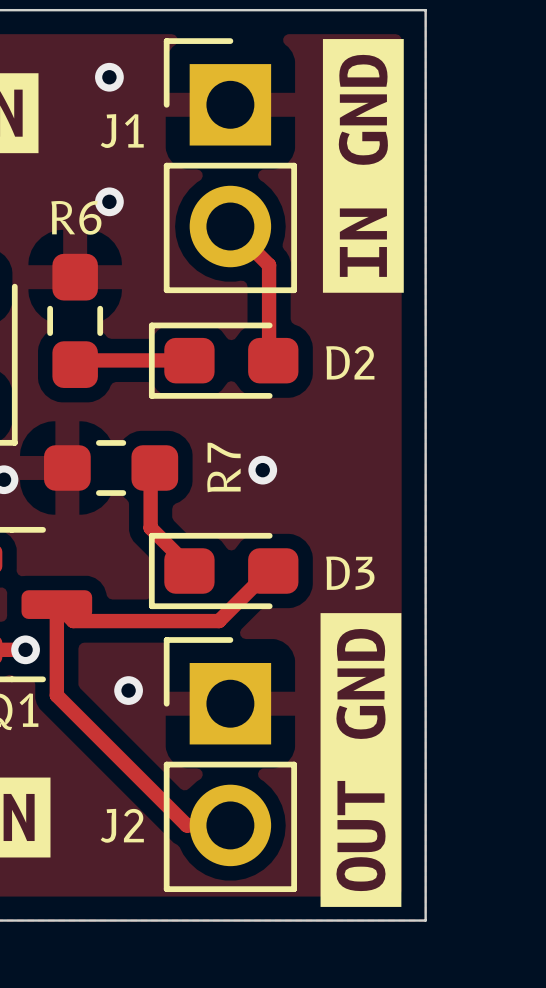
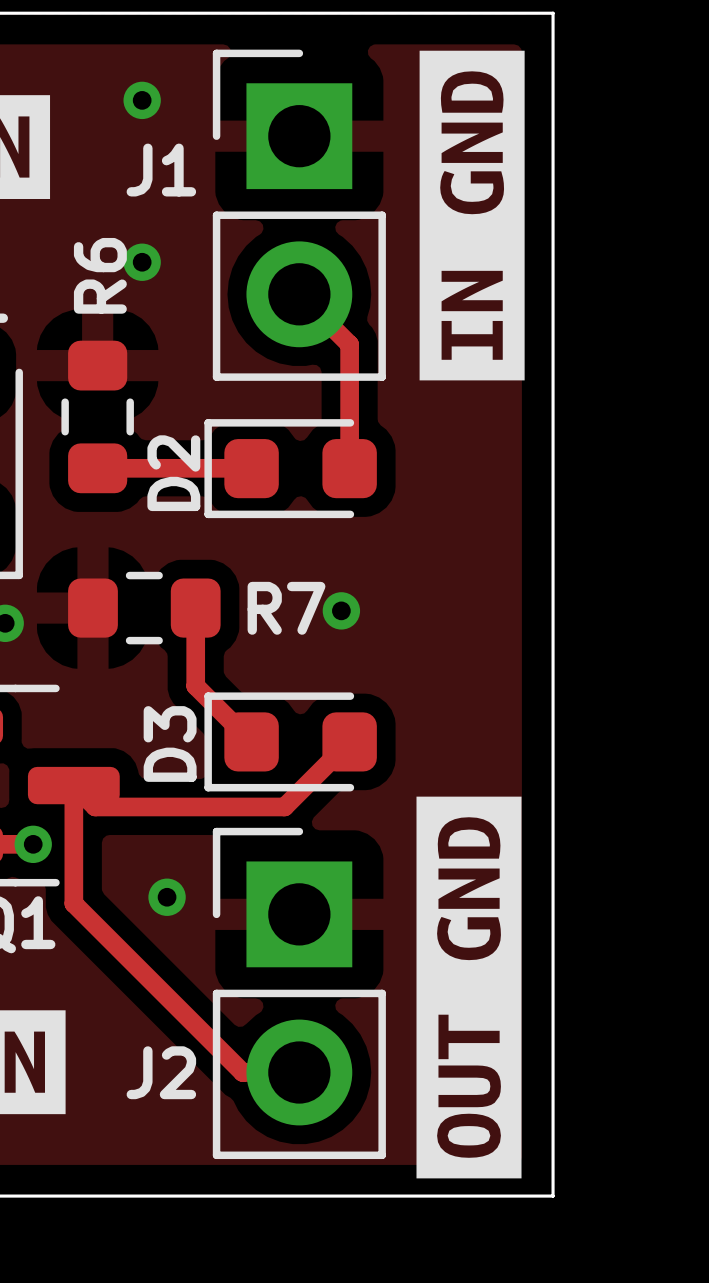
R6 name rotation: 0° (76, 217) -> 90° counterclockwise (100, 275)
R6 footprint: [47, 253, 104, 388] -> [61, 340, 134, 494]
D2 footprint: [148, 322, 299, 399] -> [204, 419, 377, 519]
D2 name rotation: 0° (350, 362) -> 90° counterclockwise (173, 473)
D2 name position: D2 (350, 362) -> D2 (173, 473)
R7 footprint: [44, 440, 179, 496] -> [68, 571, 221, 645]
R7 name rotation: 0° (223, 467) -> 90° clockwise (286, 608)
D3 footprint: [148, 532, 299, 610] -> [204, 692, 377, 792]
D3 name rotation: 0° (350, 573) -> 90° counterclockwise (170, 743)
D3 name position: D3 (350, 573) -> D3 (170, 743)

